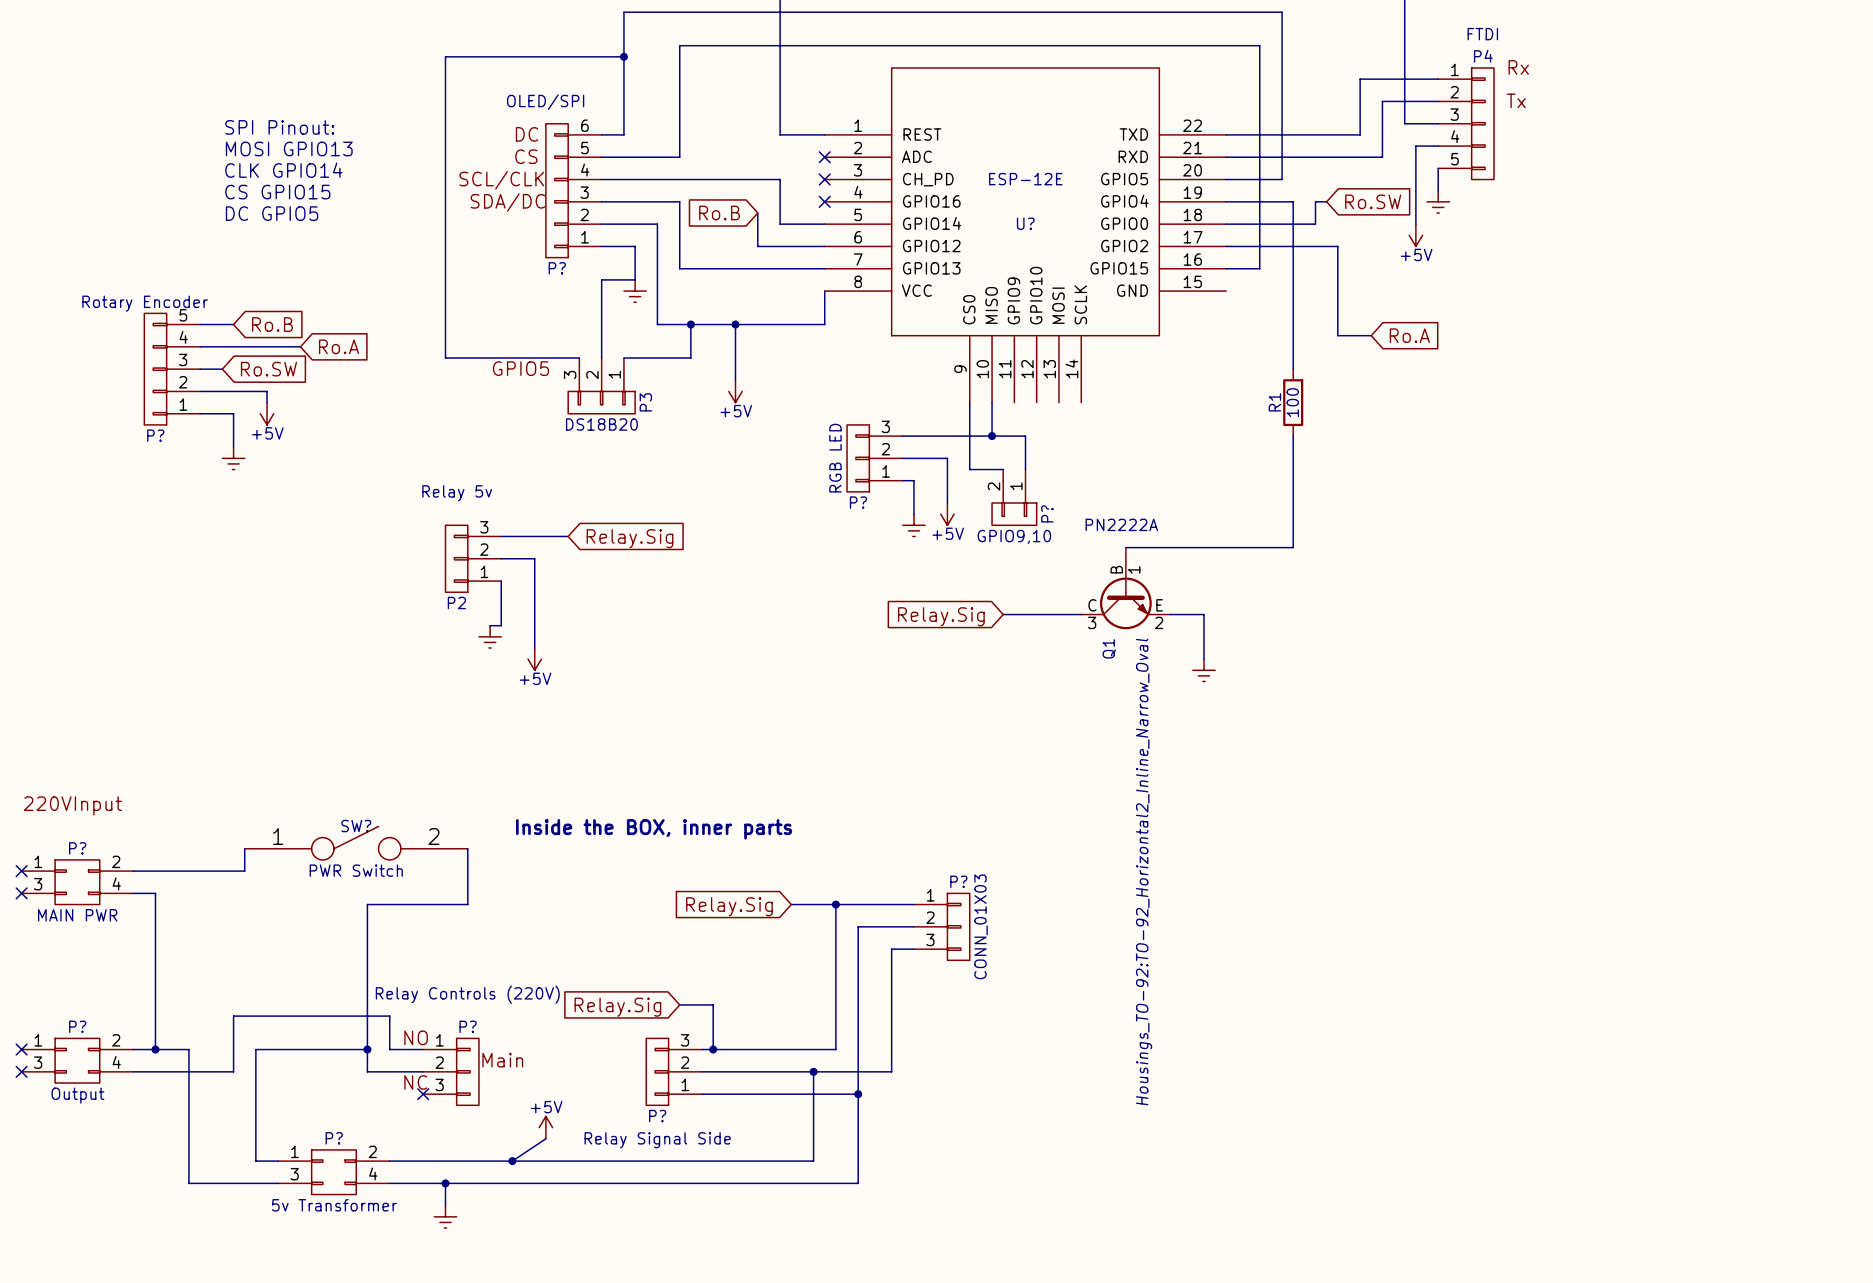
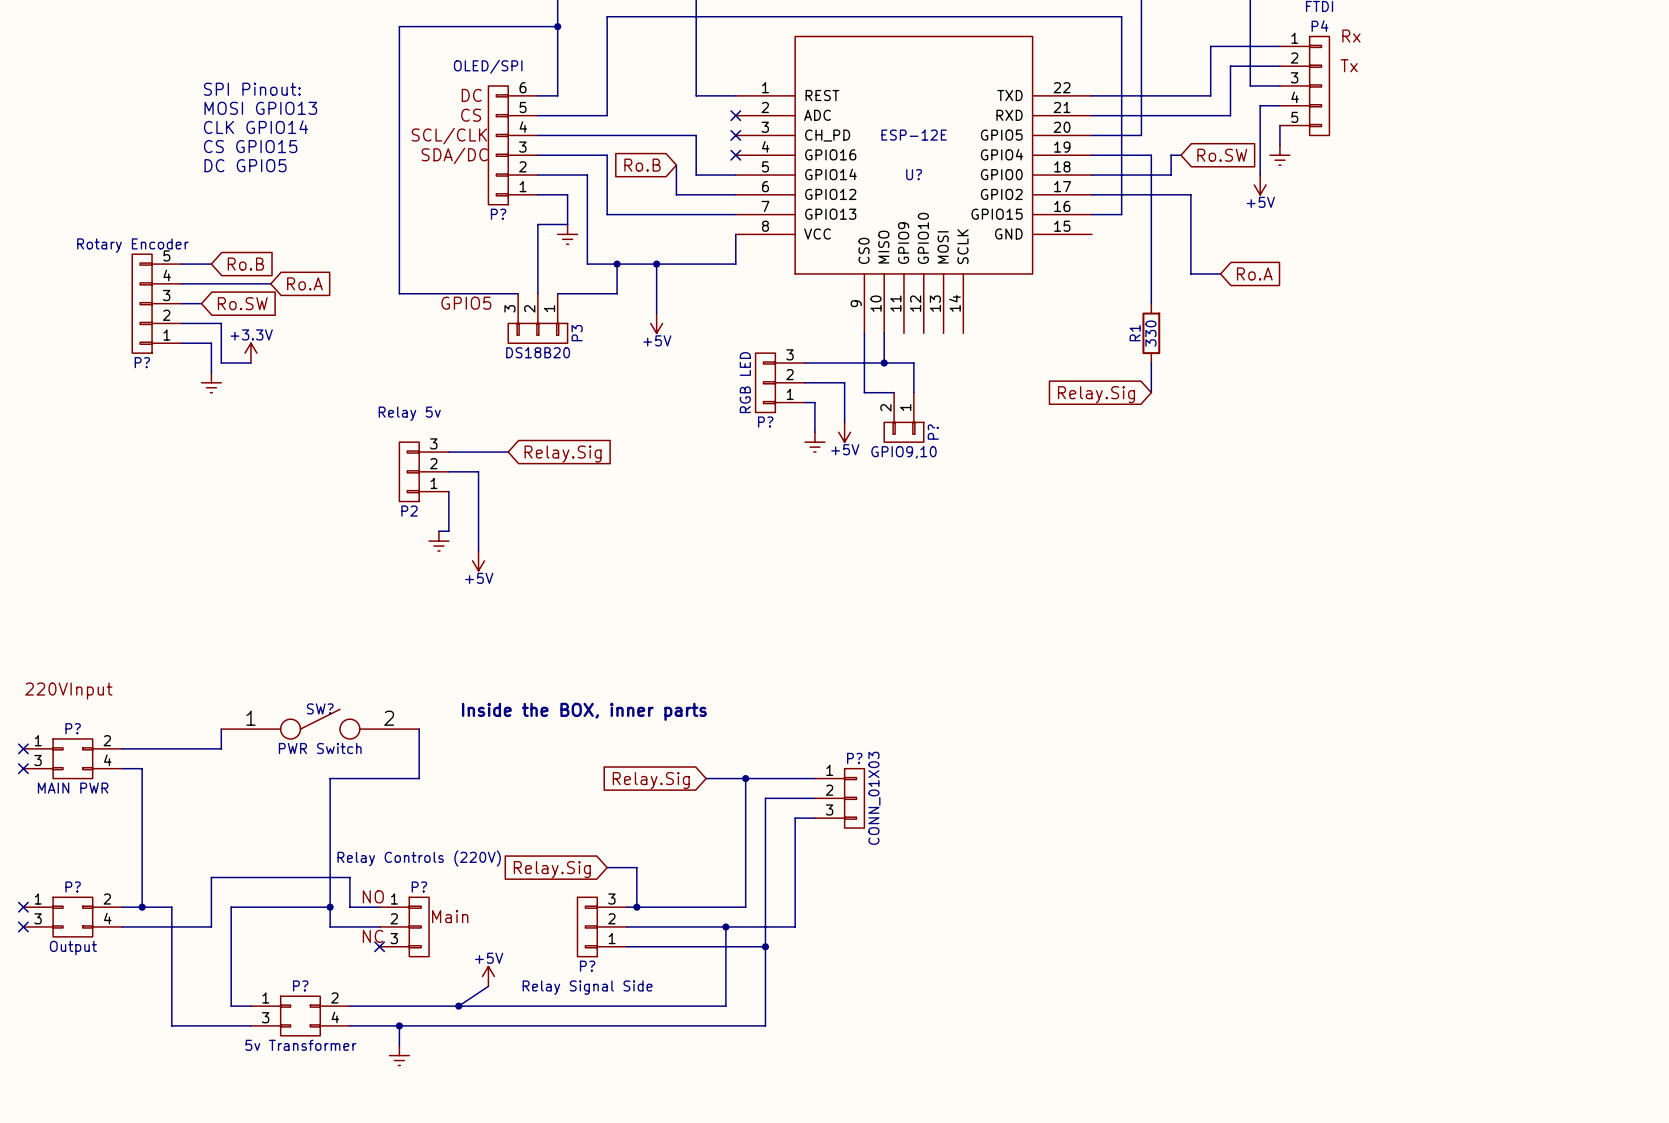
wire: (244, 391) (267, 391) (267, 402) -> (221, 323) (221, 363) (250, 363)
R1 value: 100 (1292, 402) -> 330 (1150, 333)
power symbol: +5V (267, 413) -> none
power symbol: none -> +3.3V (250, 353)
wire: (1293, 469) (1293, 547) (1125, 547) -> none
global label: none -> Relay.Sig (1096, 394)
Q1: PN2222A (1125, 588) -> none
wire: (1003, 614) (1081, 614) -> none
wire: (1170, 614) (1203, 614) (1203, 659) -> none
global label: Relay.Sig (941, 616) -> none
power symbol: (1203, 670) -> none

